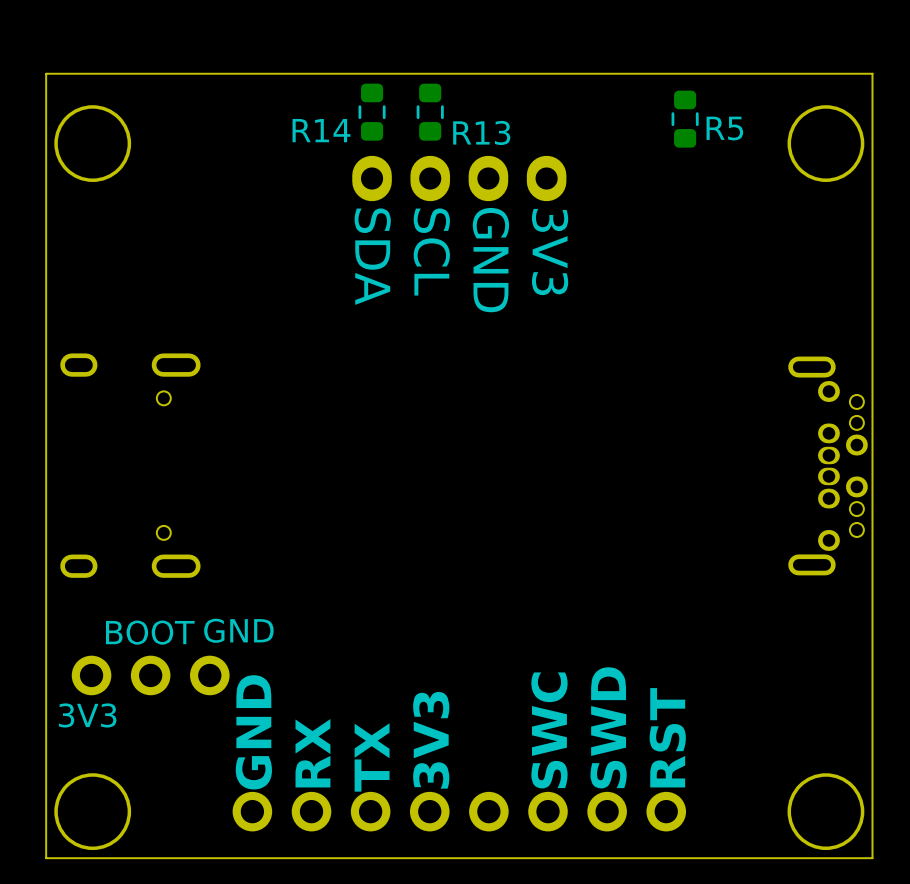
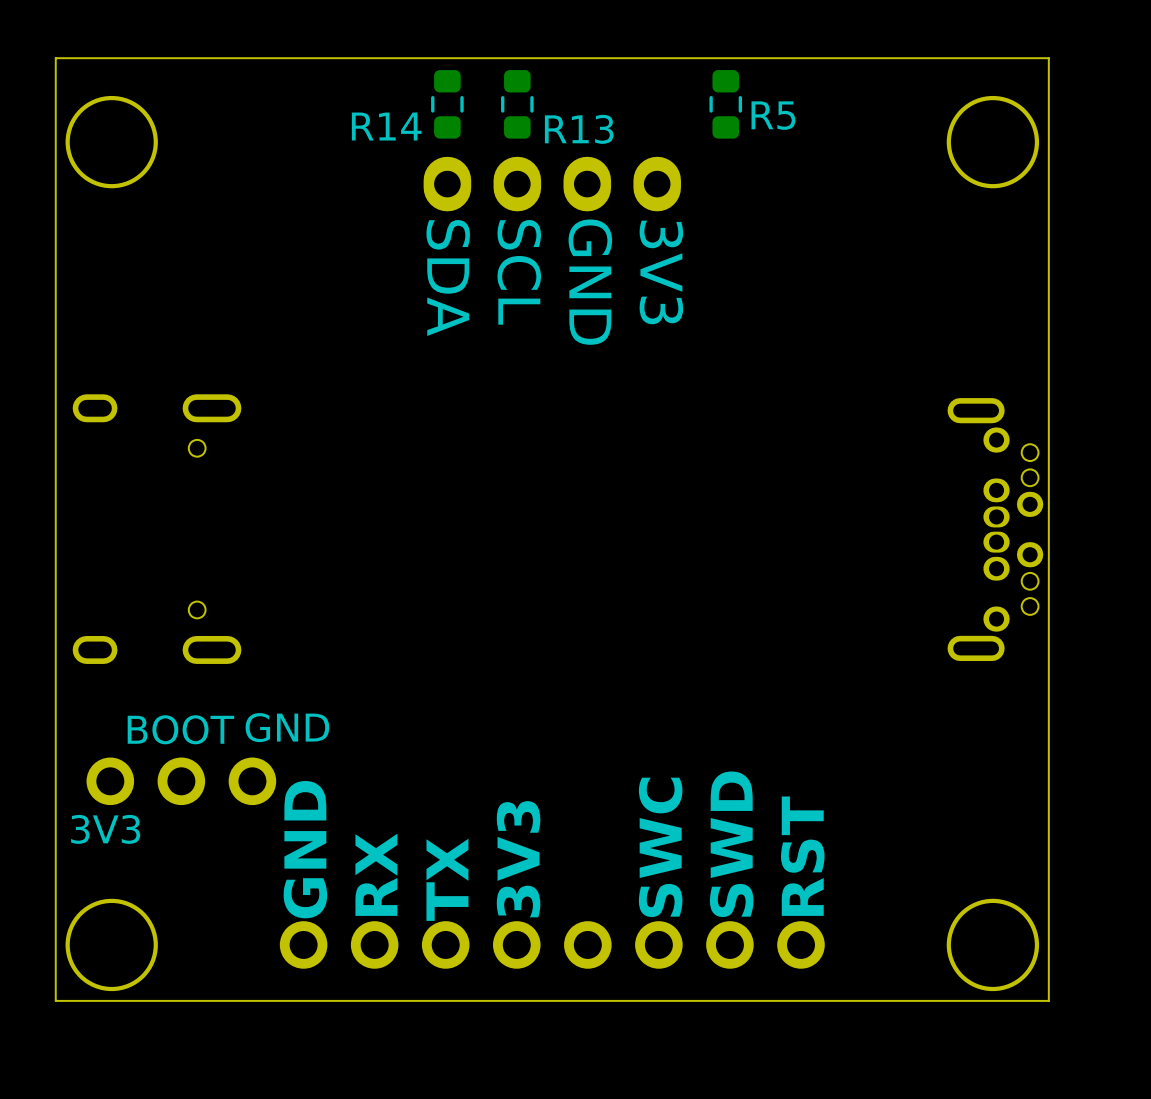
R5 position: (685, 119) -> (725, 104)

